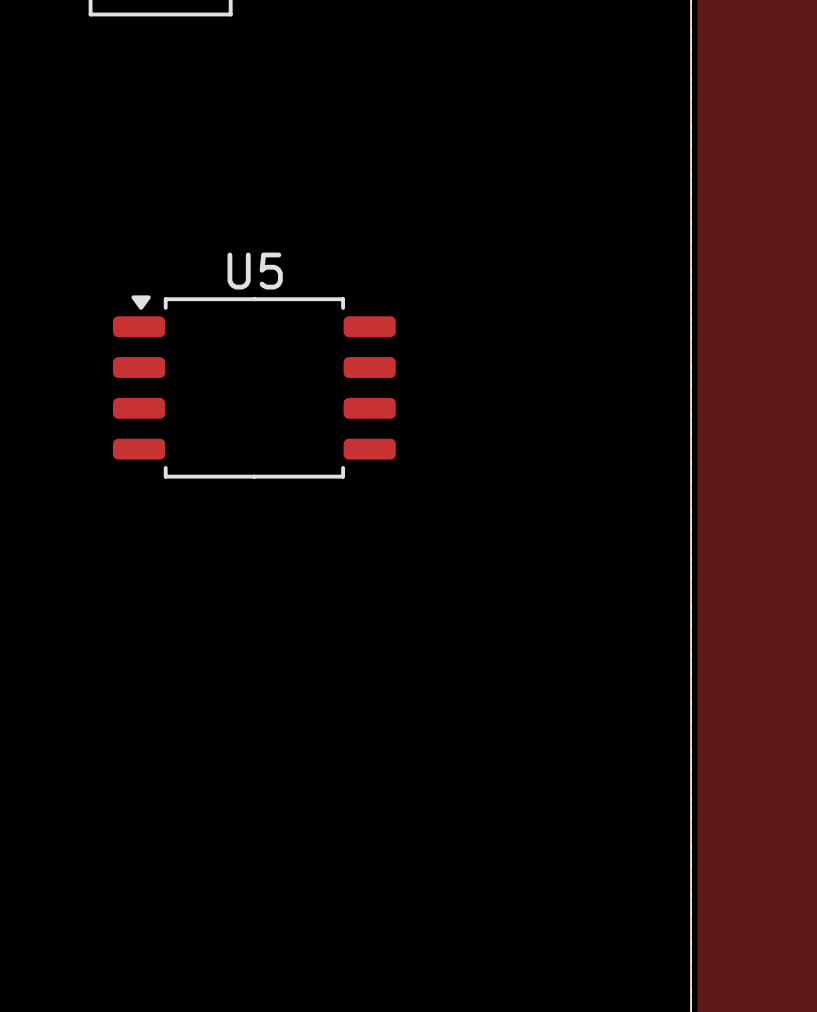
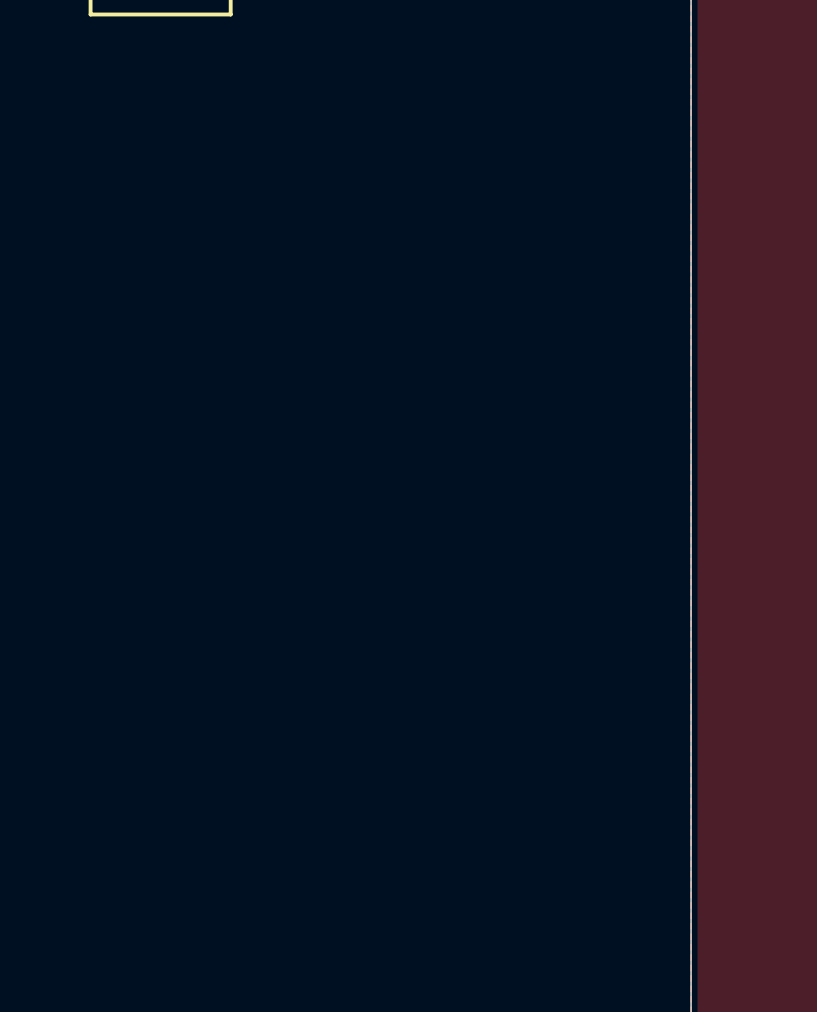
U5: (254, 386) -> none

